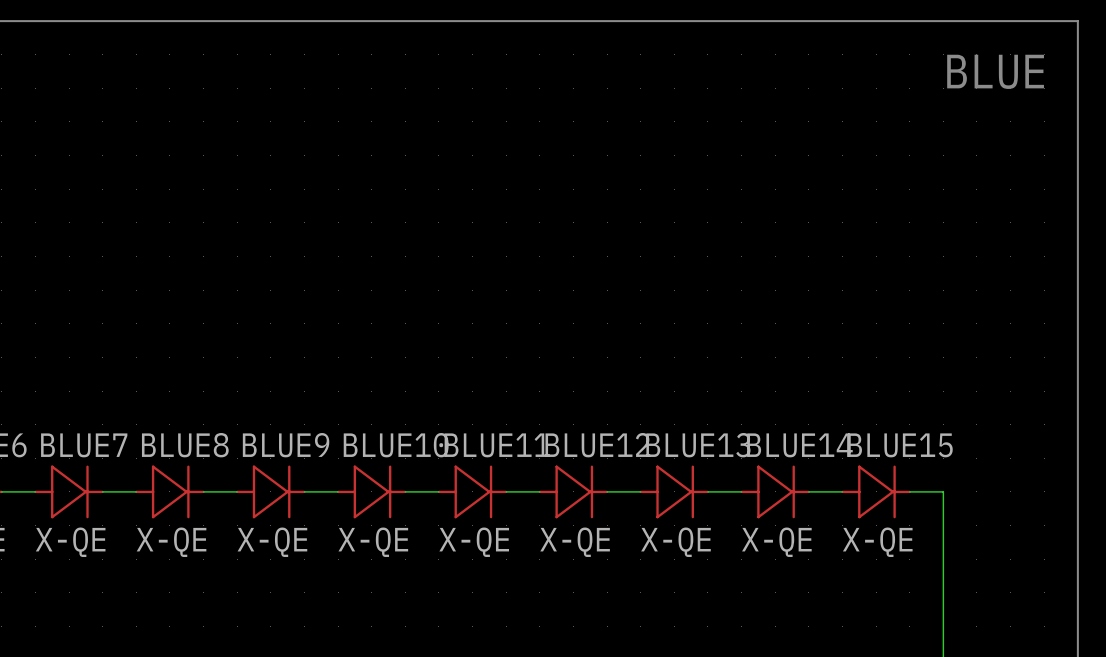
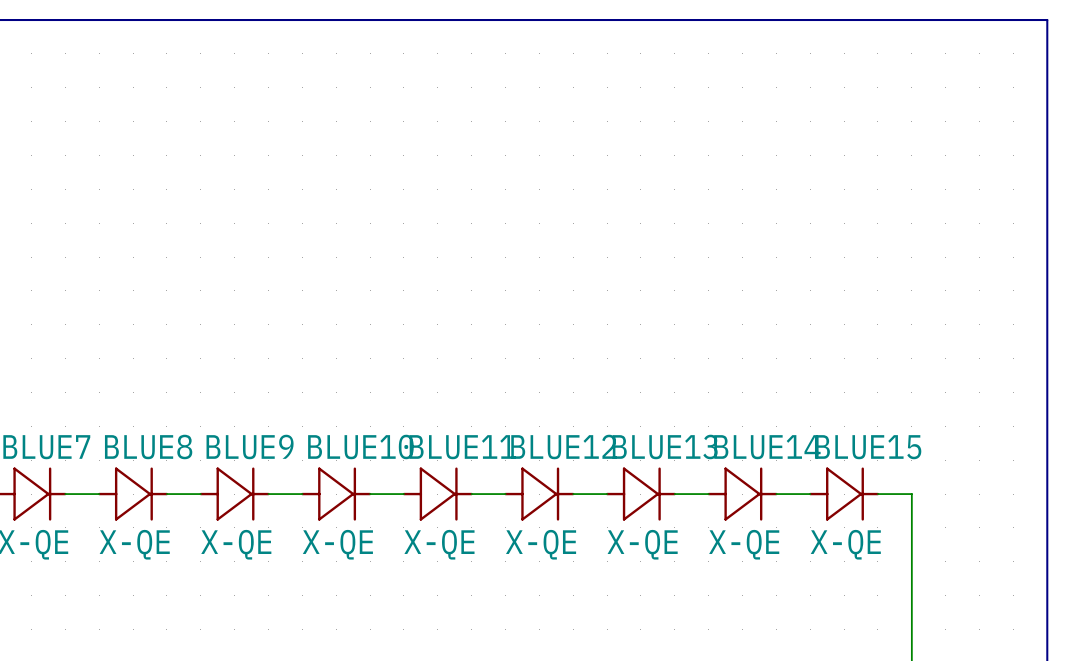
text: BLUE (995, 71) -> none

